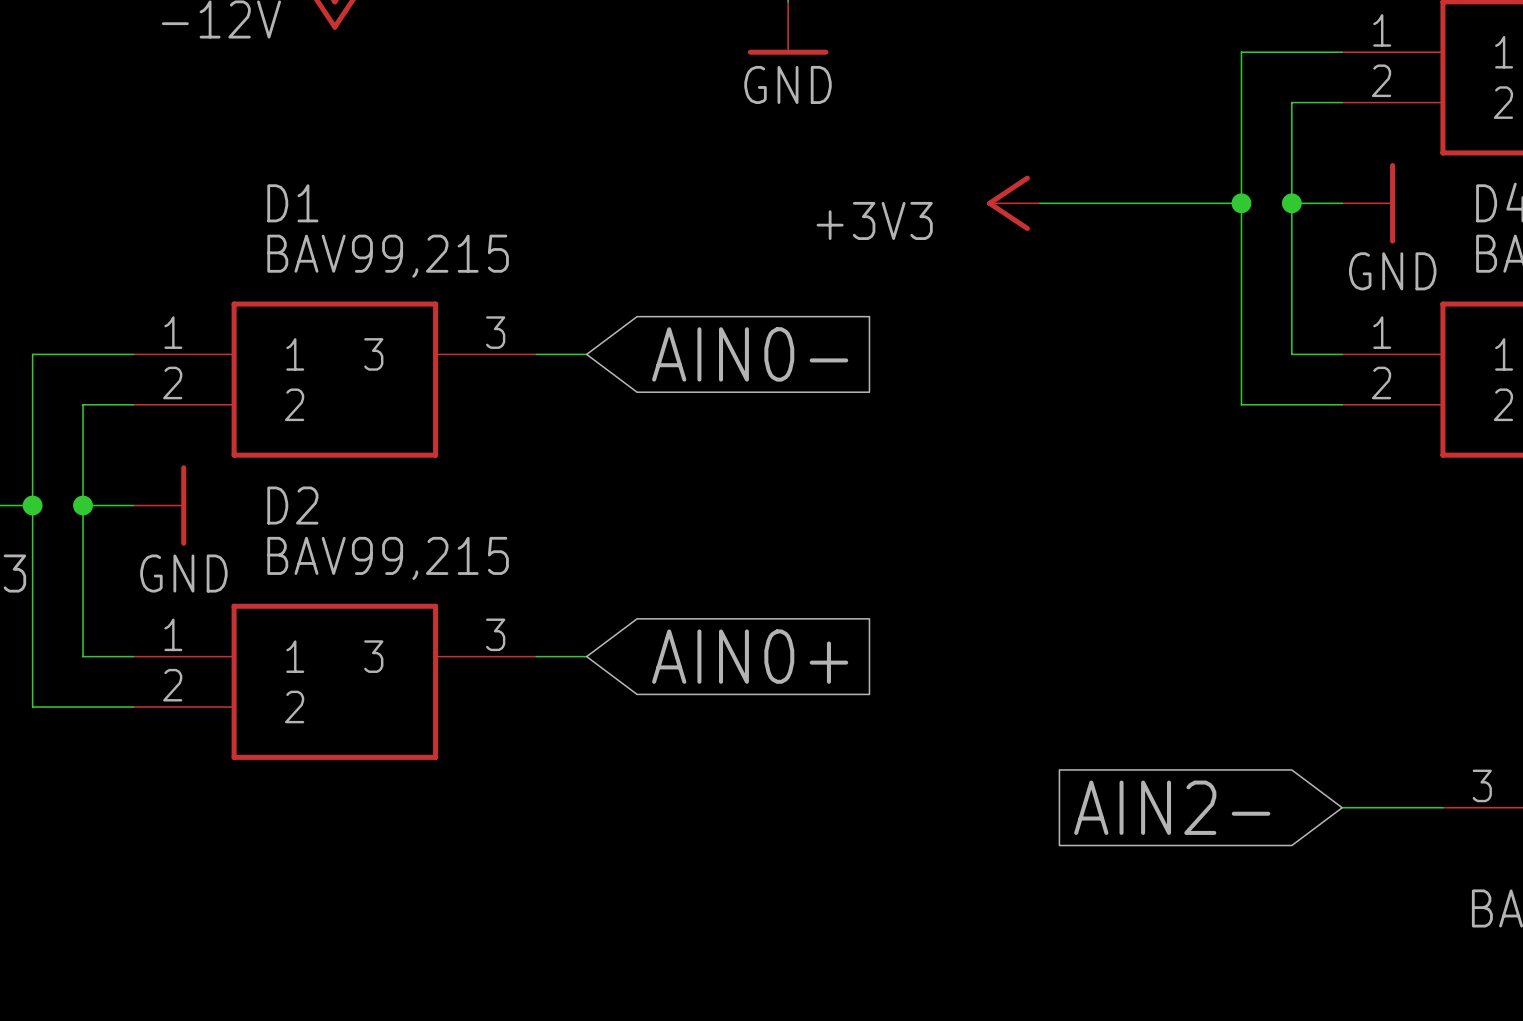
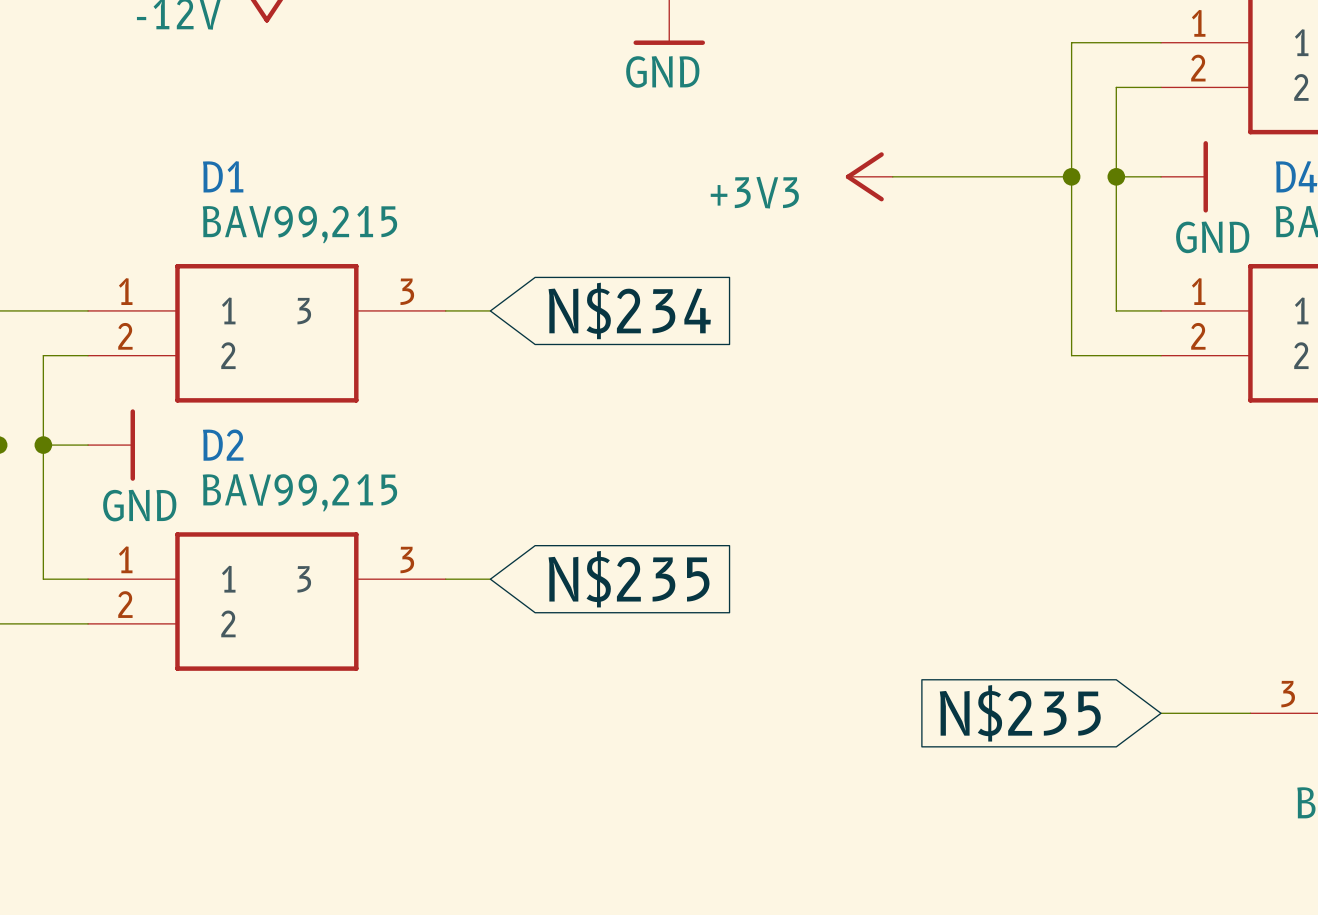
global label: AIN0- (750, 354) -> N$234 (629, 310)
global label: AIN0+ (750, 656) -> N$235 (629, 579)
global label: AIN2- (1172, 807) -> N$235 (1020, 713)

